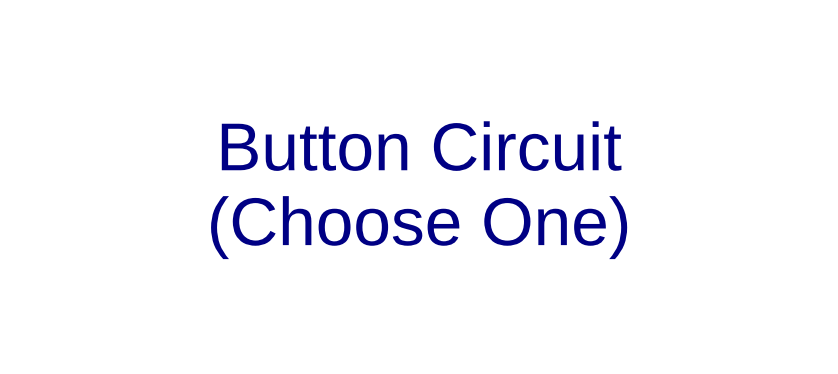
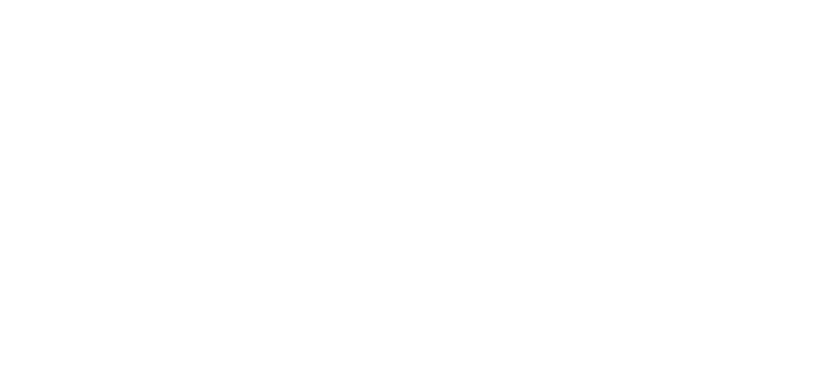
text: Button Circuit (421, 146) -> none
text: (Choose One) (419, 227) -> none

